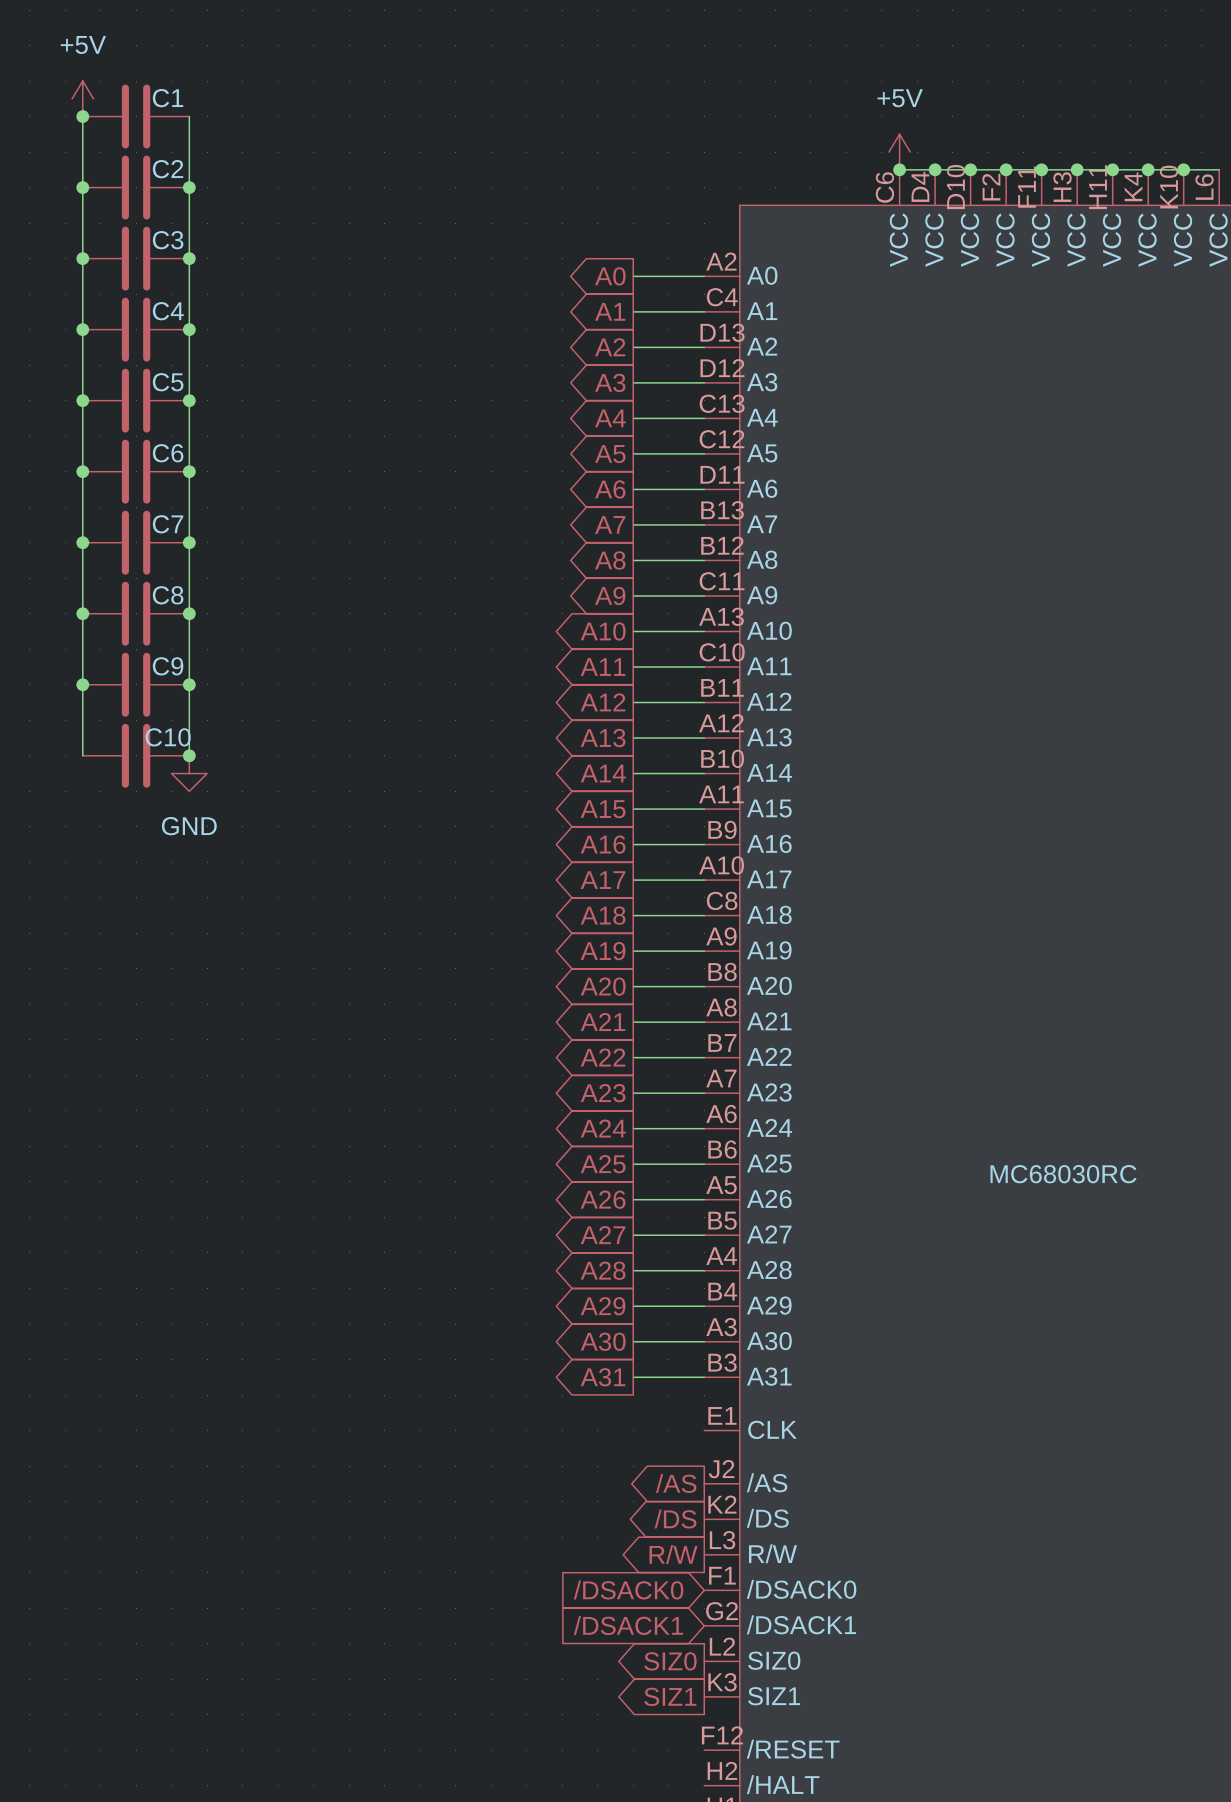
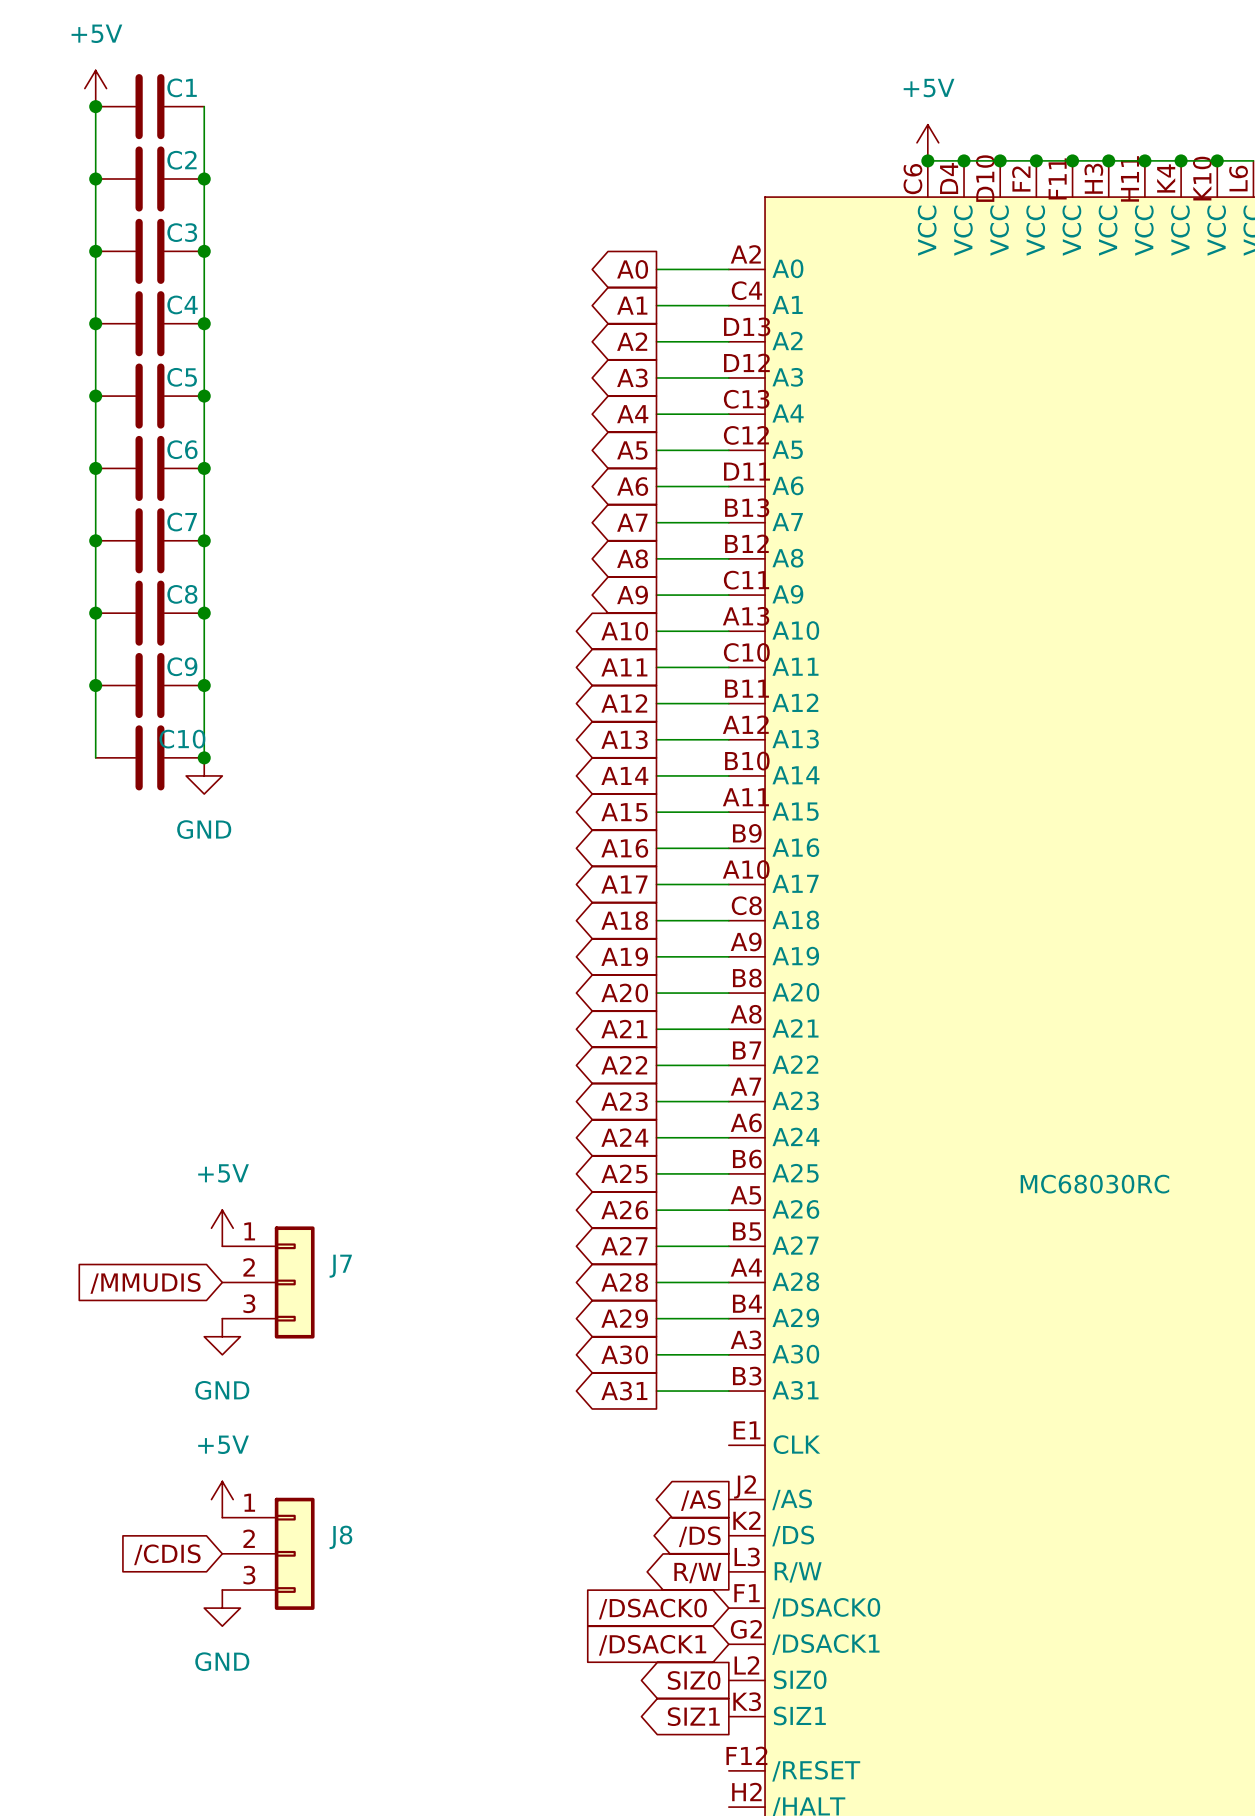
power symbol: none -> +5V (222, 1228)
global label: none -> /MMUDIS (145, 1283)
J7: none -> (268, 1282)
power symbol: none -> GND (222, 1336)
power symbol: none -> +5V (222, 1499)
global label: none -> /CDIS (167, 1554)
J8: none -> (268, 1553)
power symbol: none -> GND (222, 1608)

